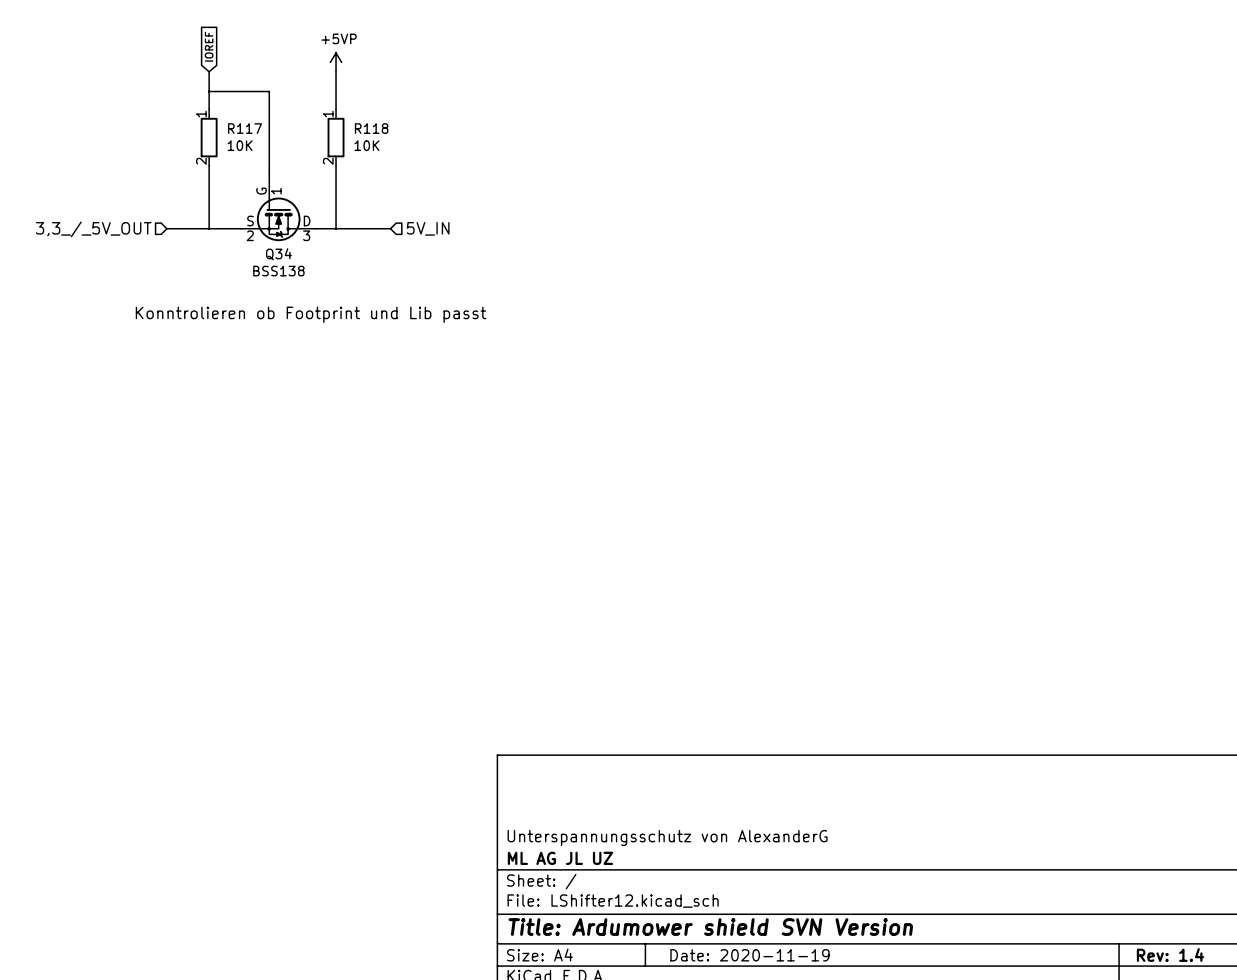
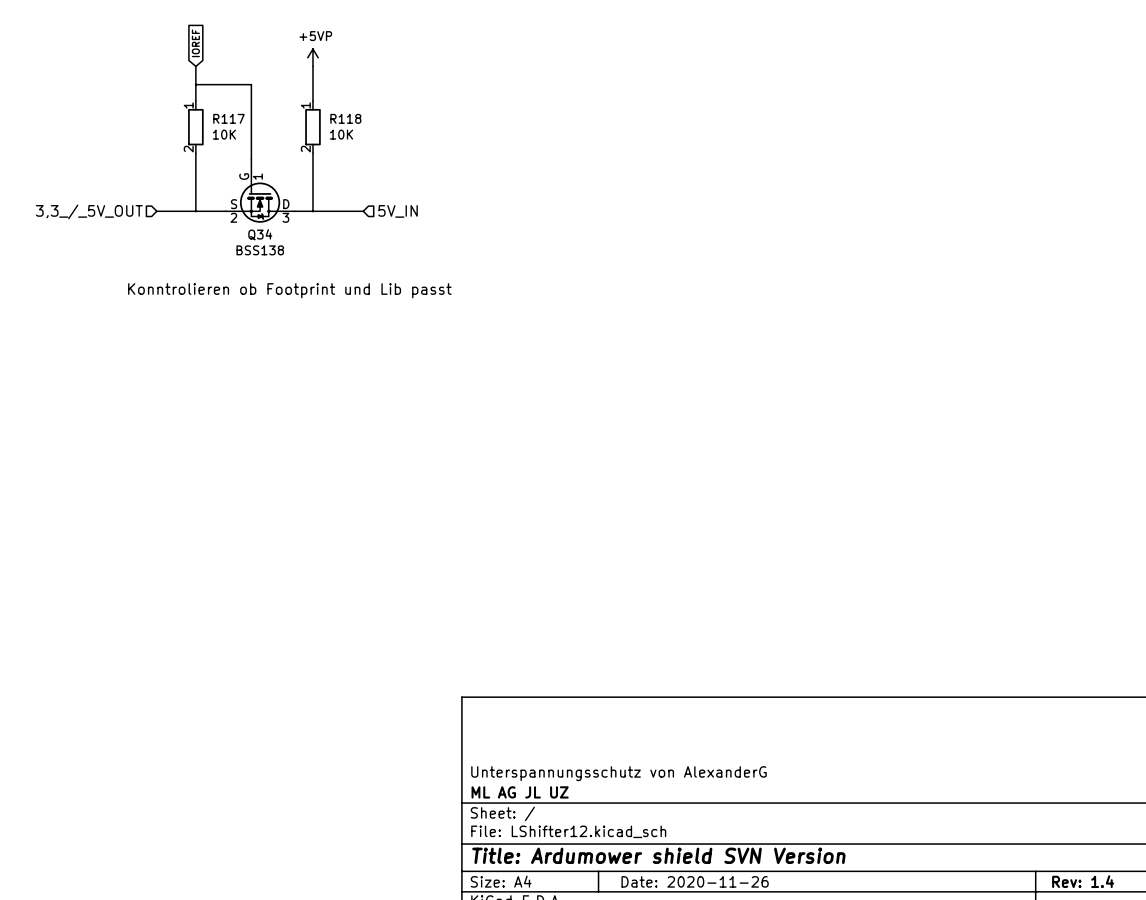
title block: Date: 2020-11-19 (750, 955) -> Date: 2020-11-26 (695, 881)

